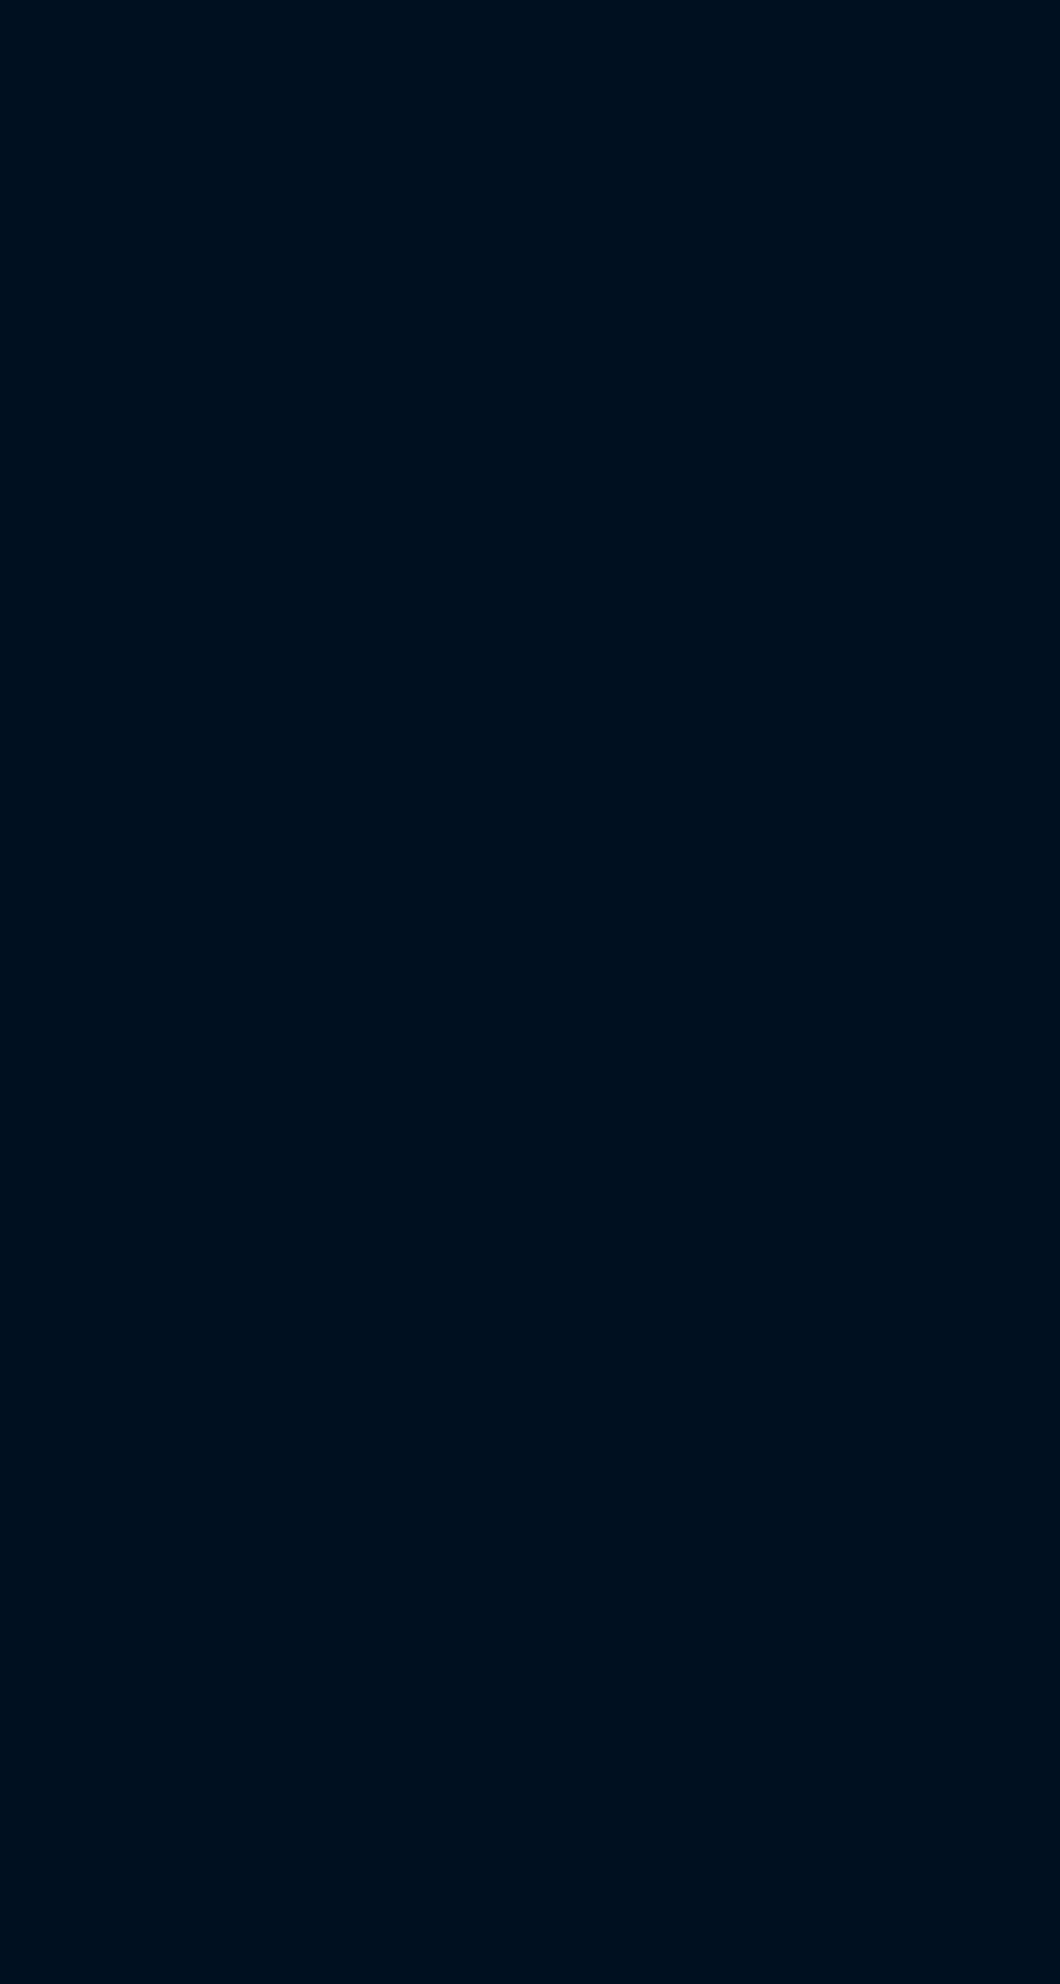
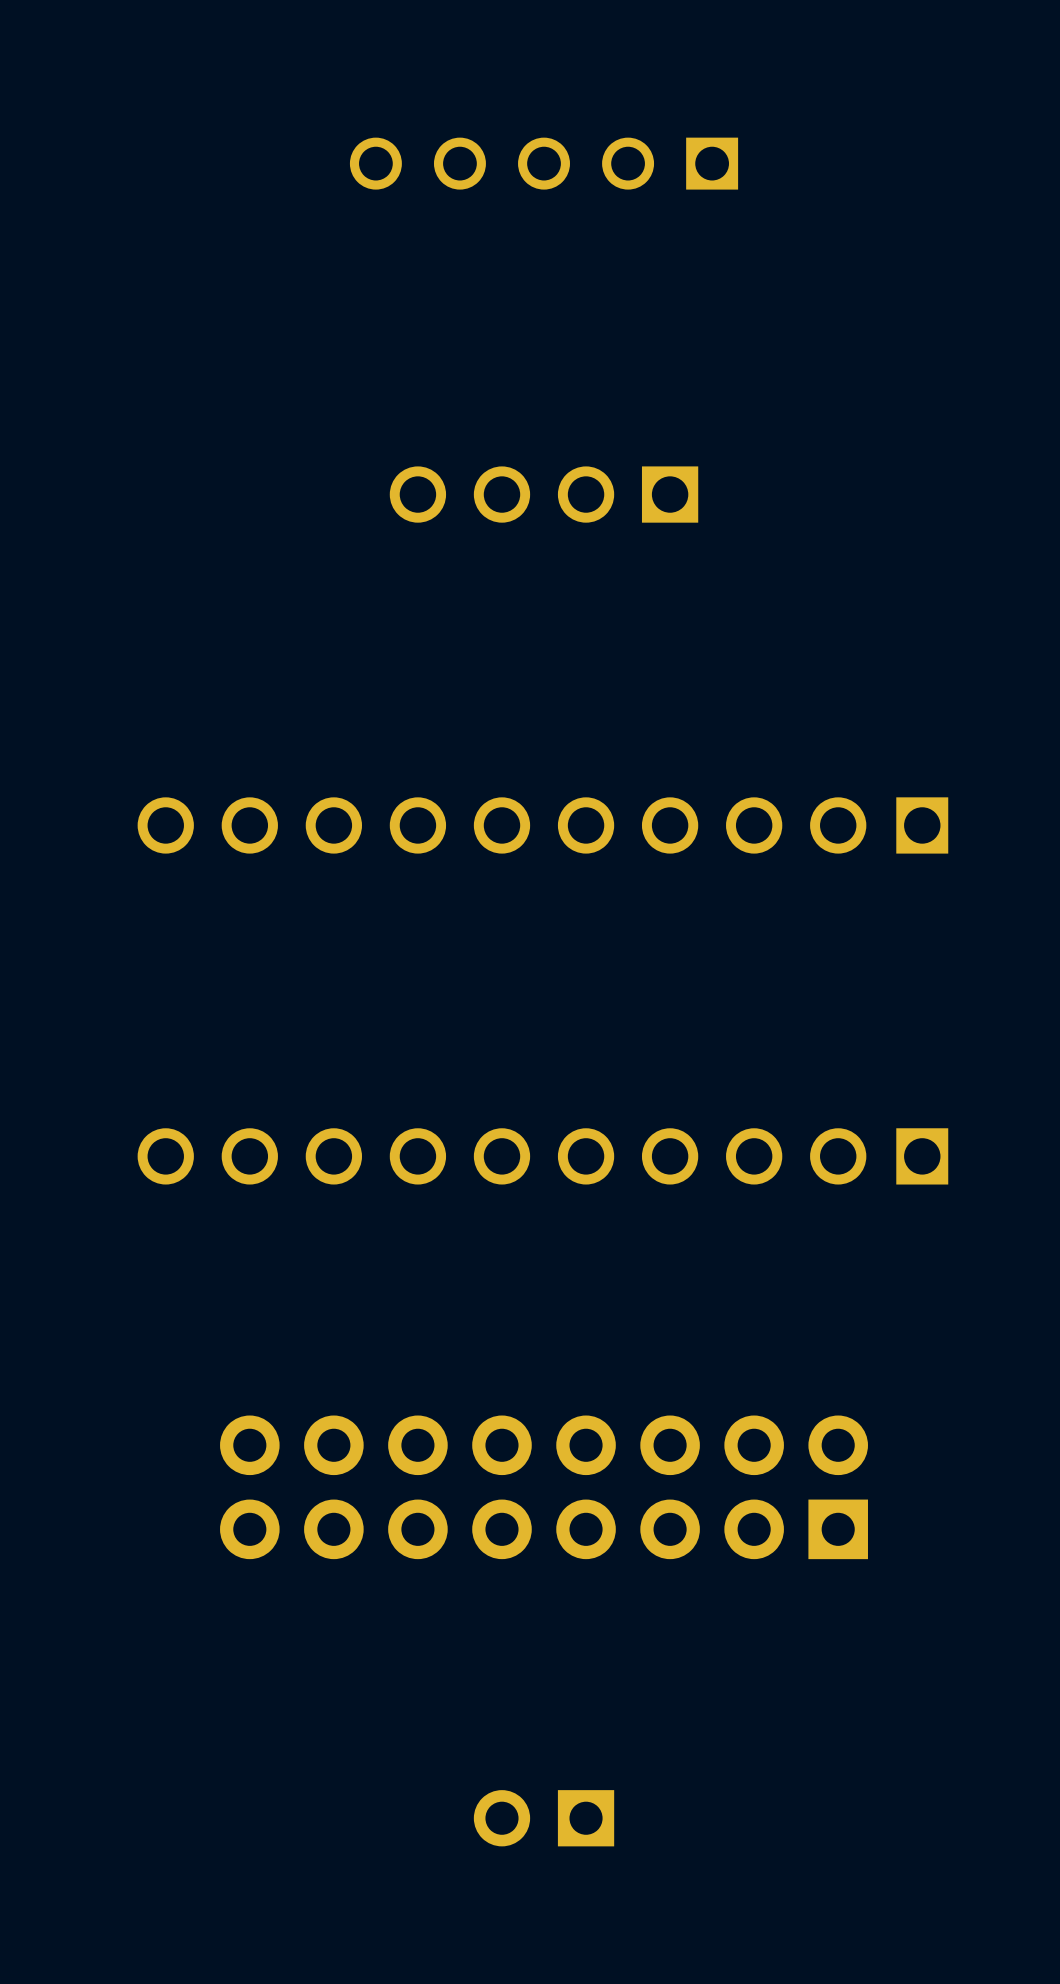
part: none -> (544, 163)
part: none -> (544, 494)
part: none -> (542, 825)
part: none -> (542, 1156)
part: none -> (544, 1487)
part: none -> (544, 1818)

